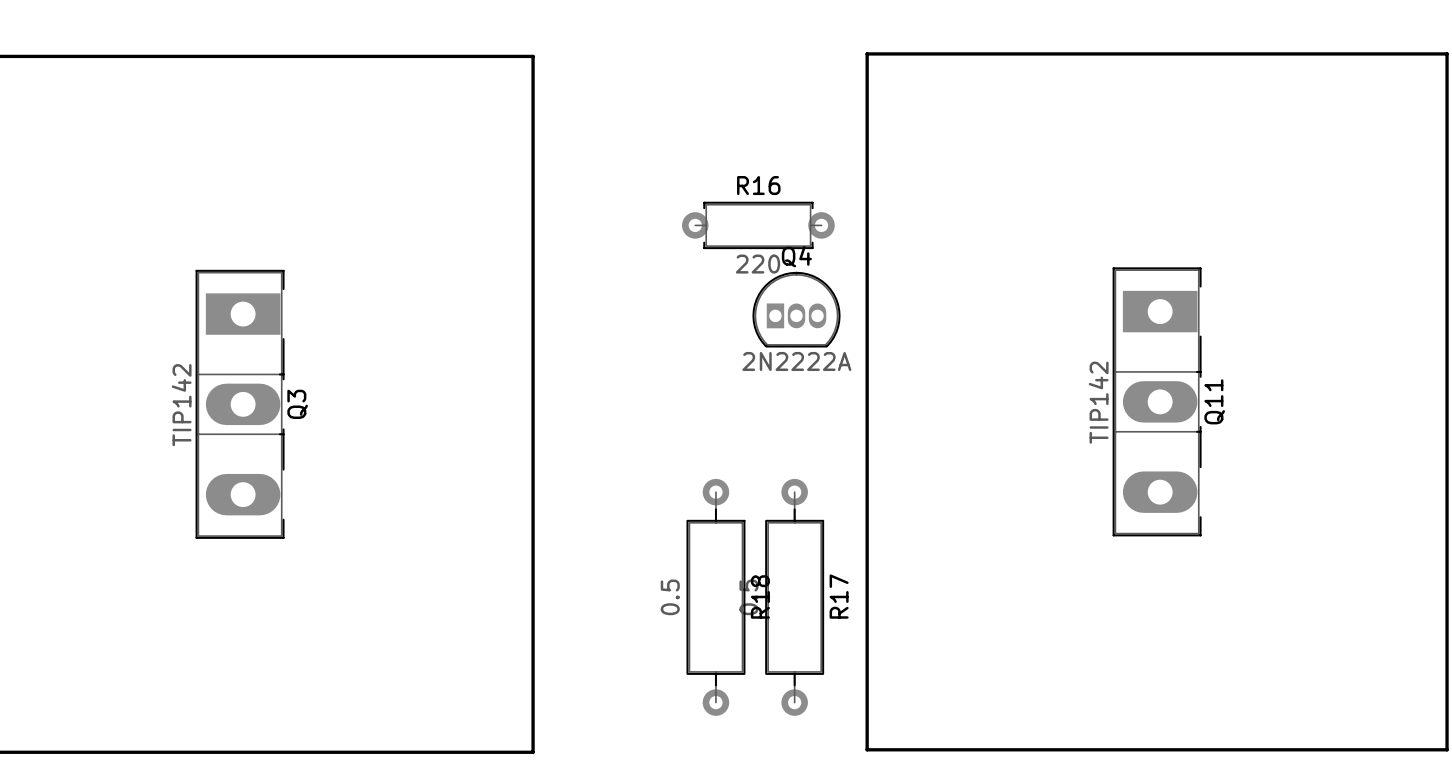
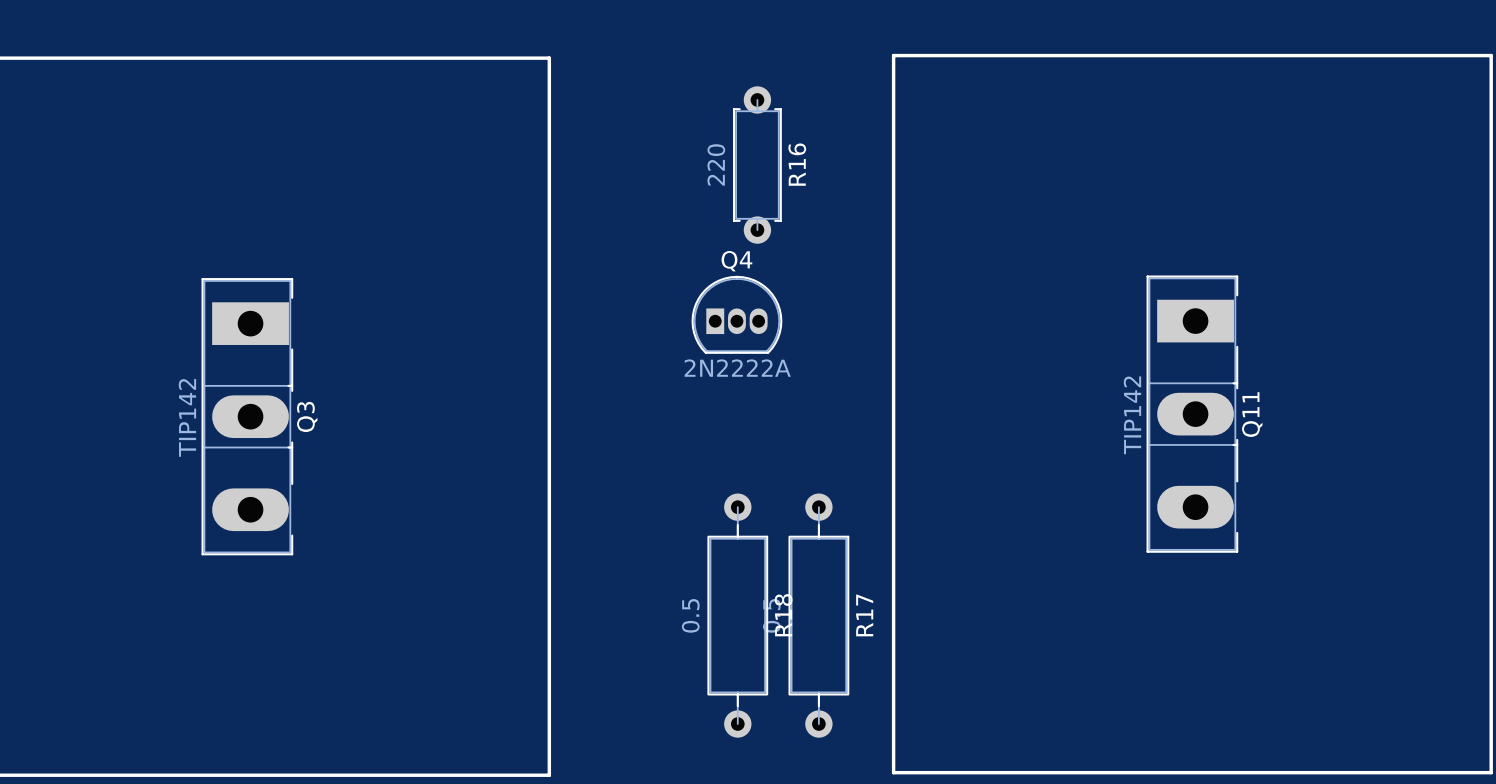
R16 rotation: 0° (758, 225) -> 90° clockwise (757, 165)
Q4 position: (796, 309) -> (736, 314)

